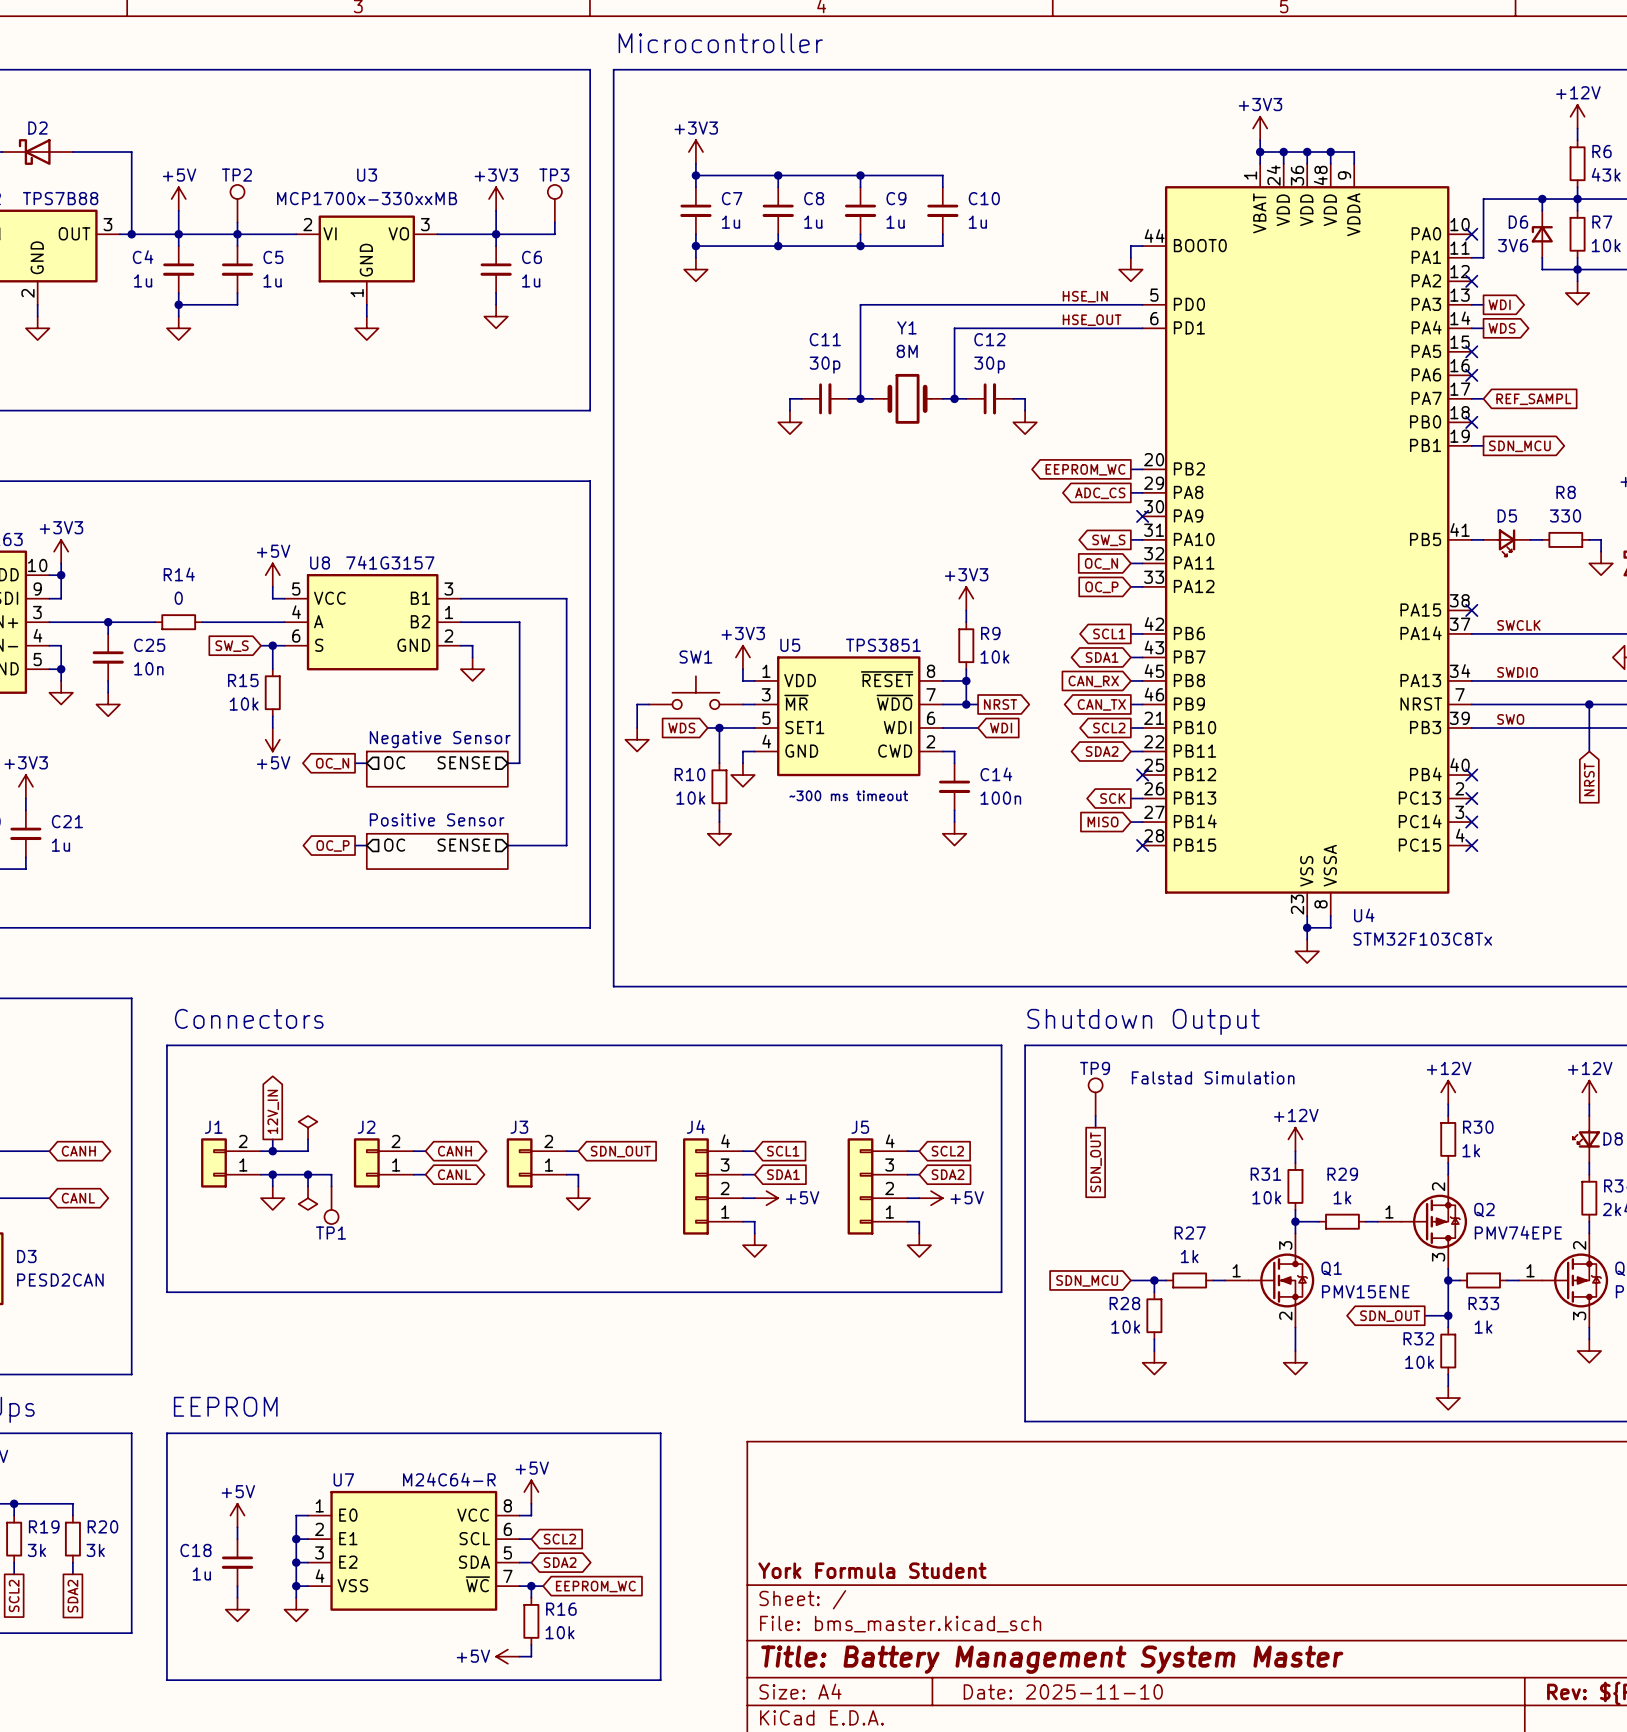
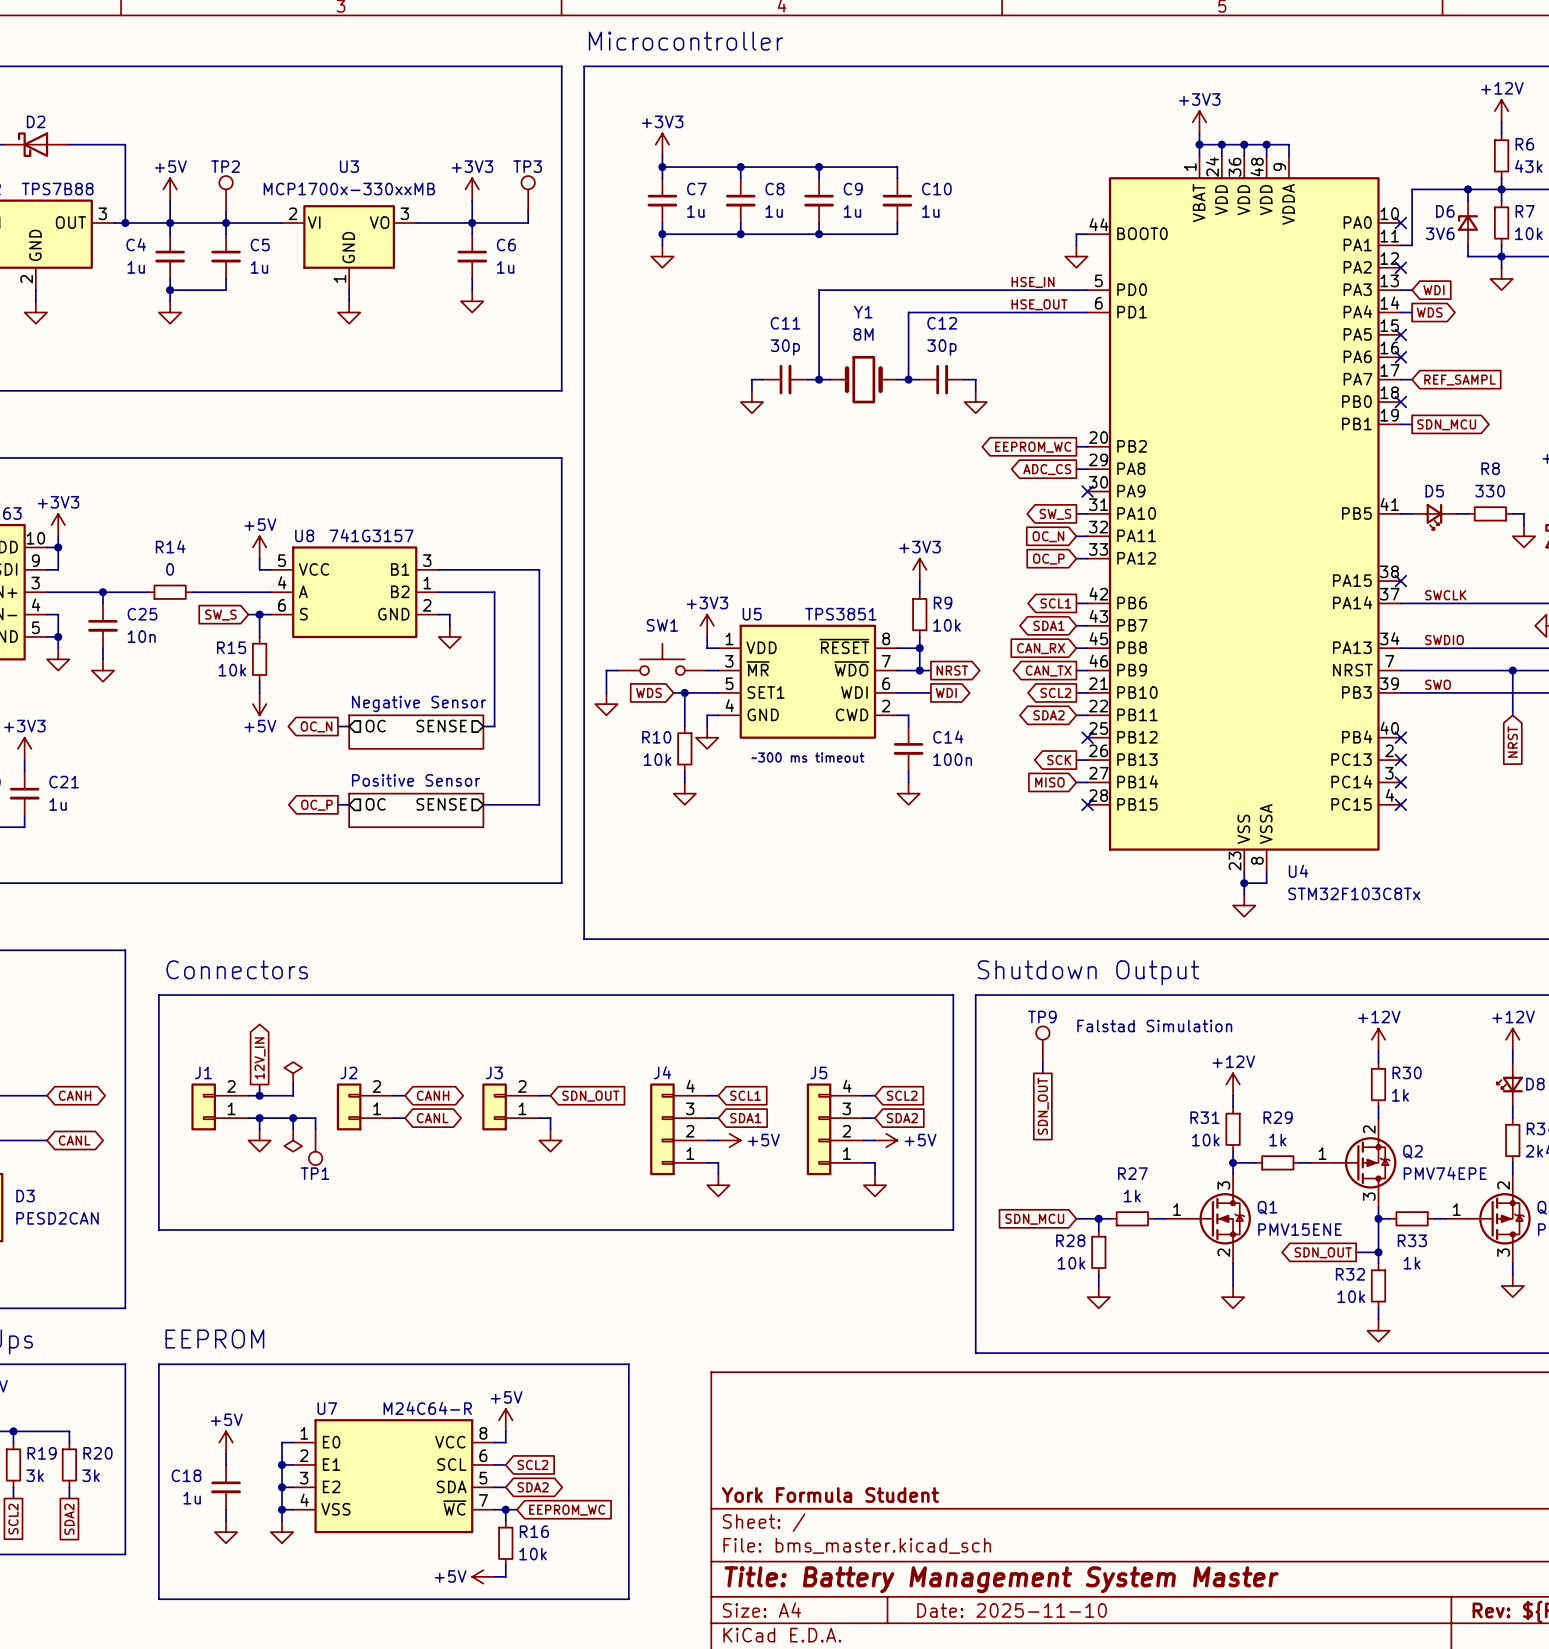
global label shape: output (1499, 304) -> input (1433, 290)
global label shape: input (1001, 727) -> output (946, 692)

